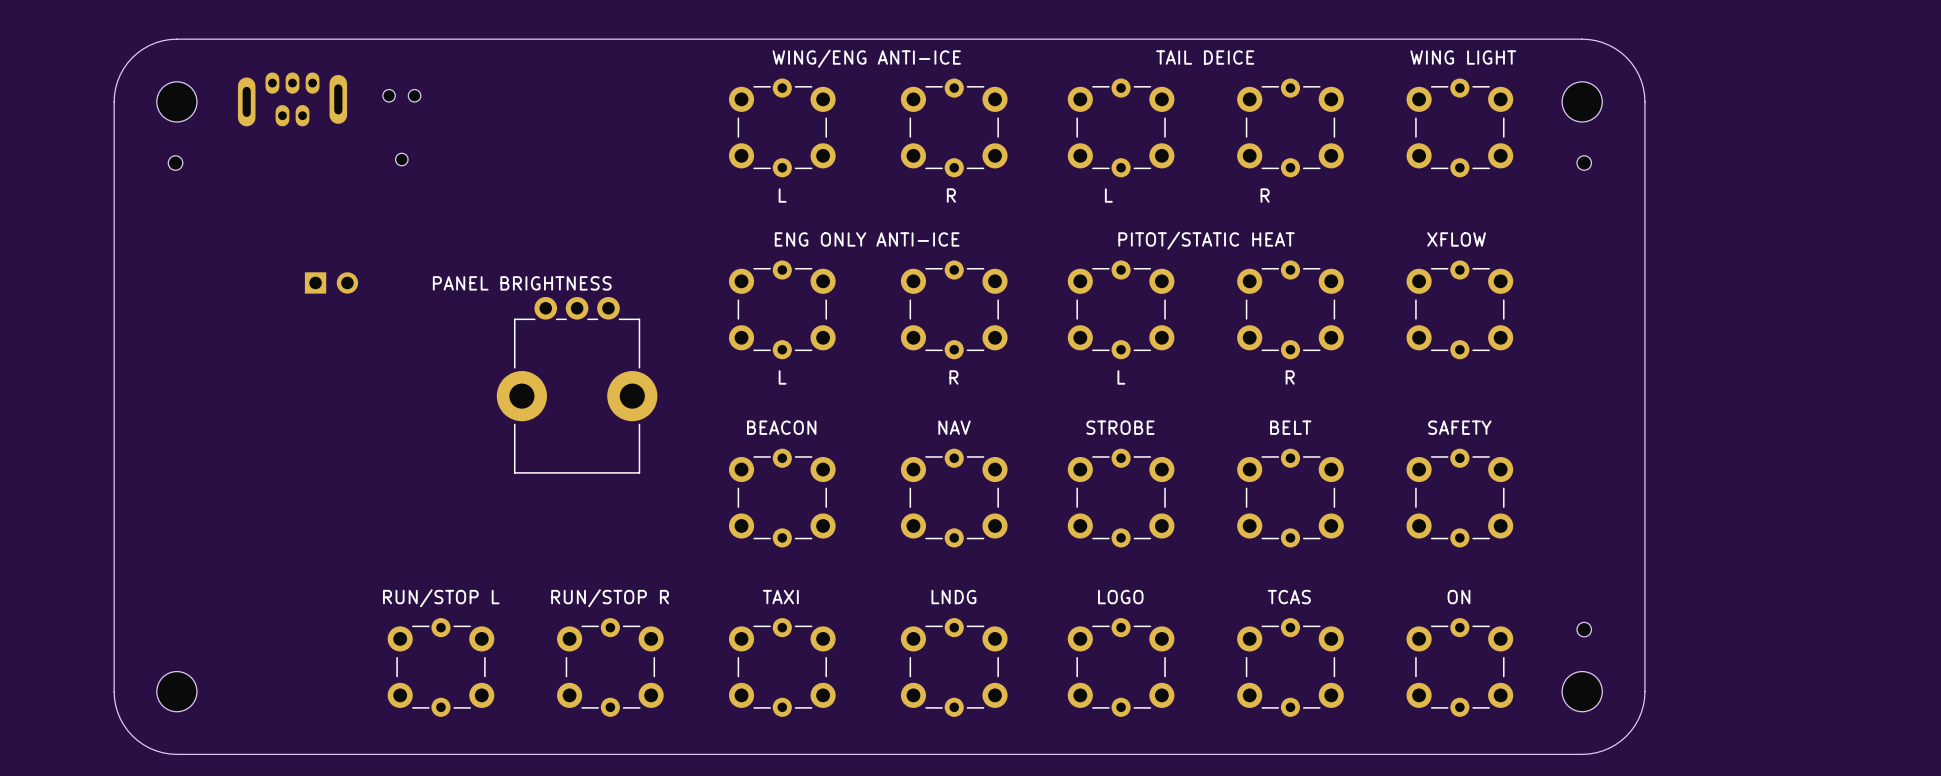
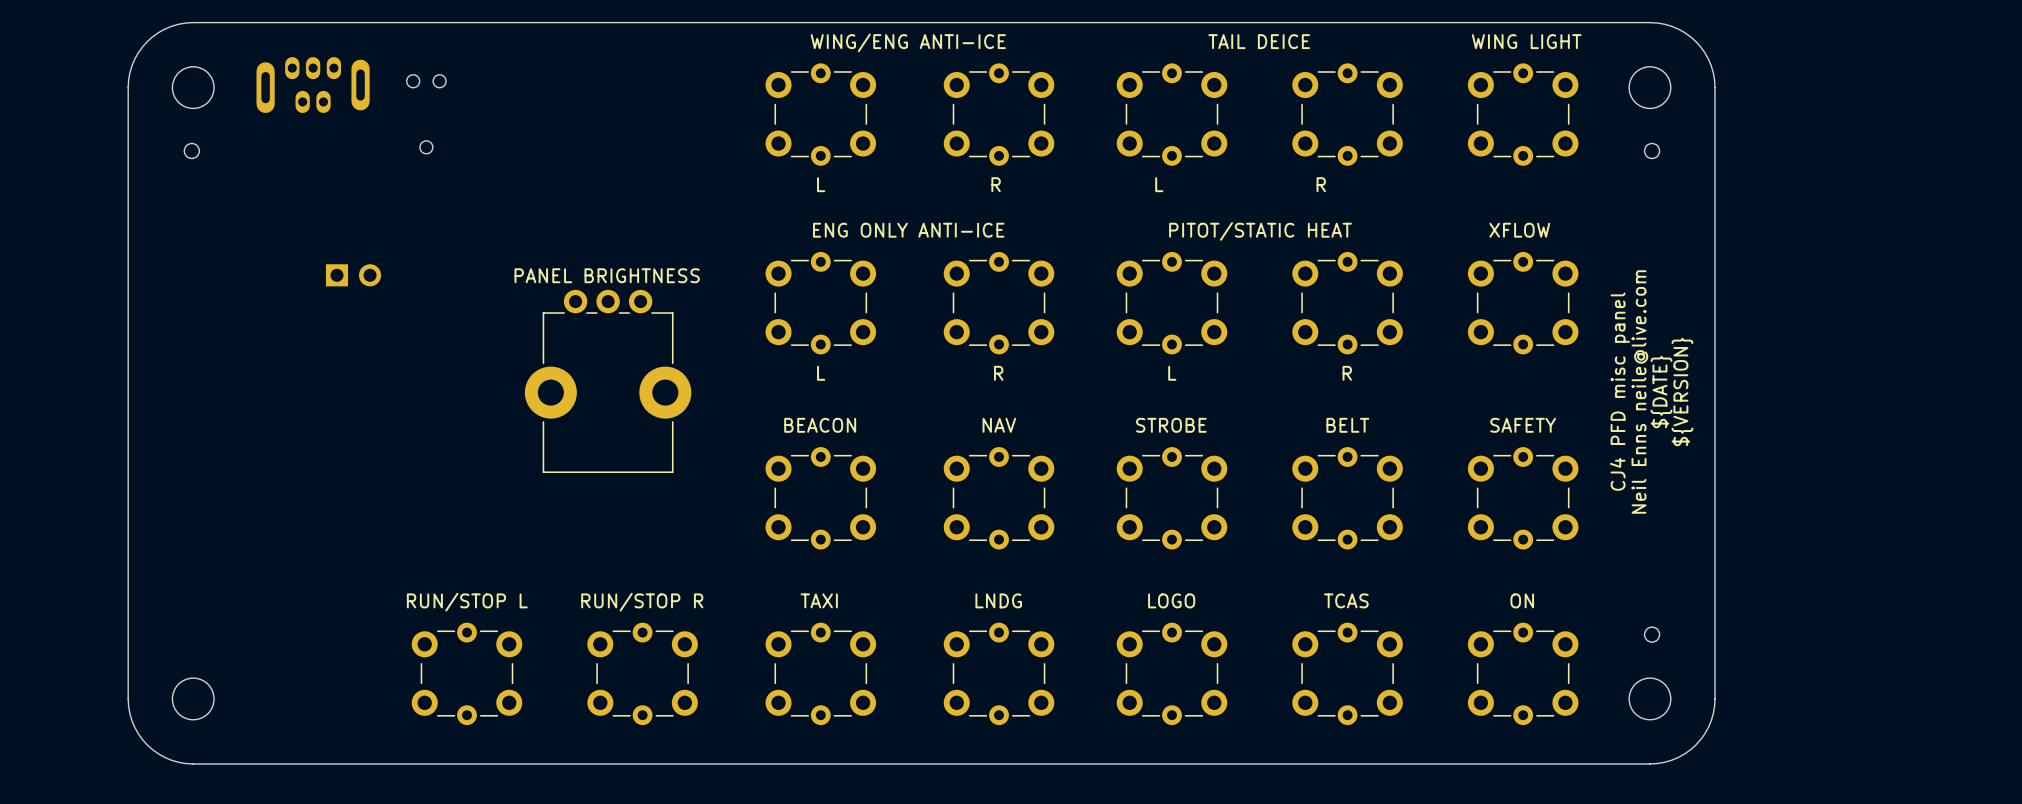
text position: PANEL BRIGHTNESS (522, 283) -> PANEL BRIGHTNESS (607, 275)
text: none -> CJ4 PFD misc panel (1619, 391)
text: none -> Neil Enns neile@live.com (1639, 391)
text: none -> ${DATE} (1661, 391)
text: none -> ${VERSION} (1682, 391)

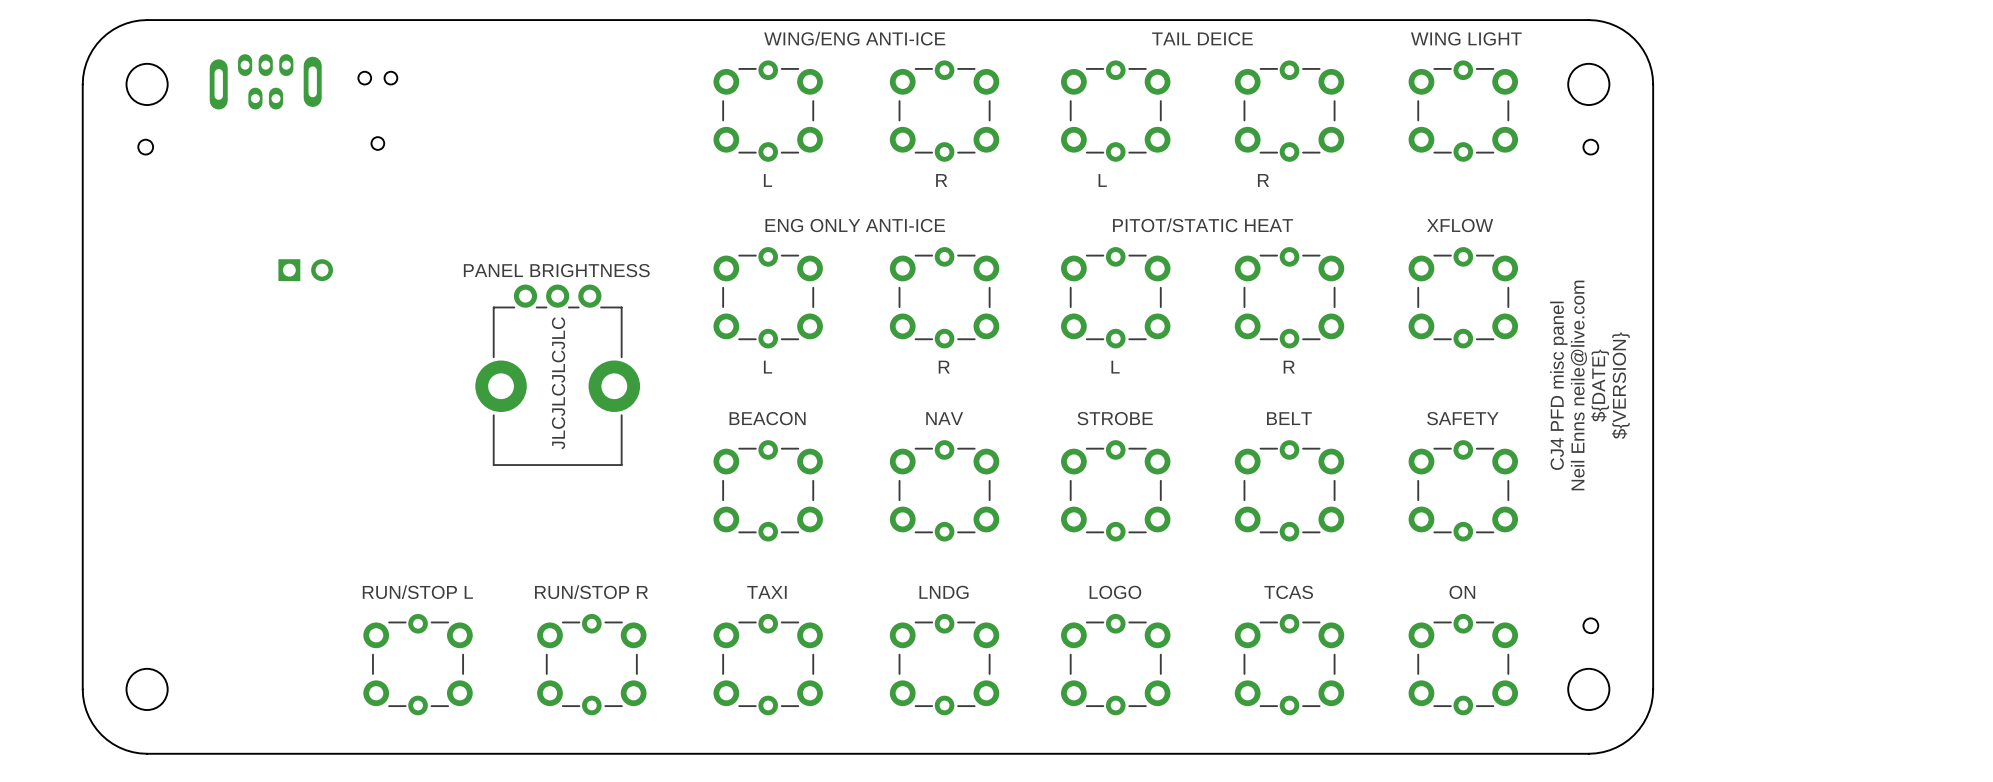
text: none -> JLCJLCJLCJLC (558, 383)

